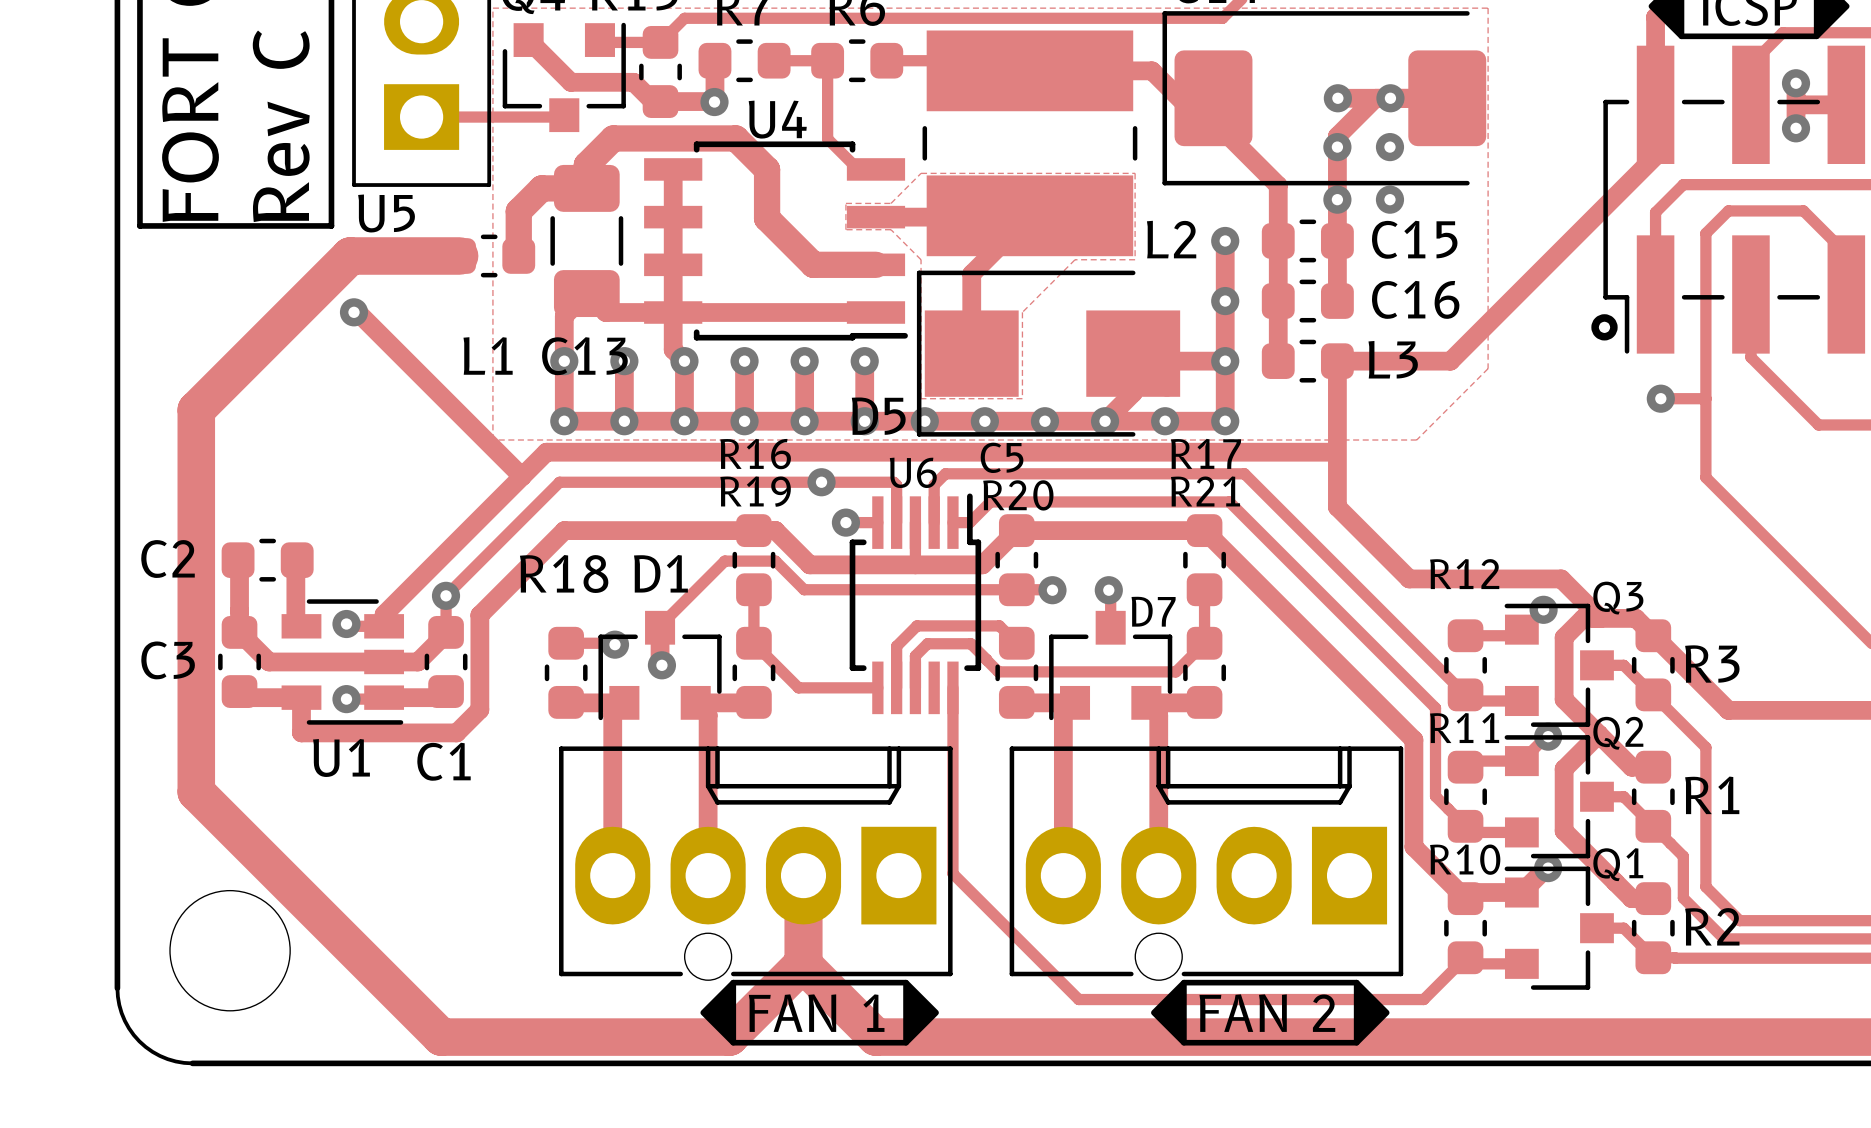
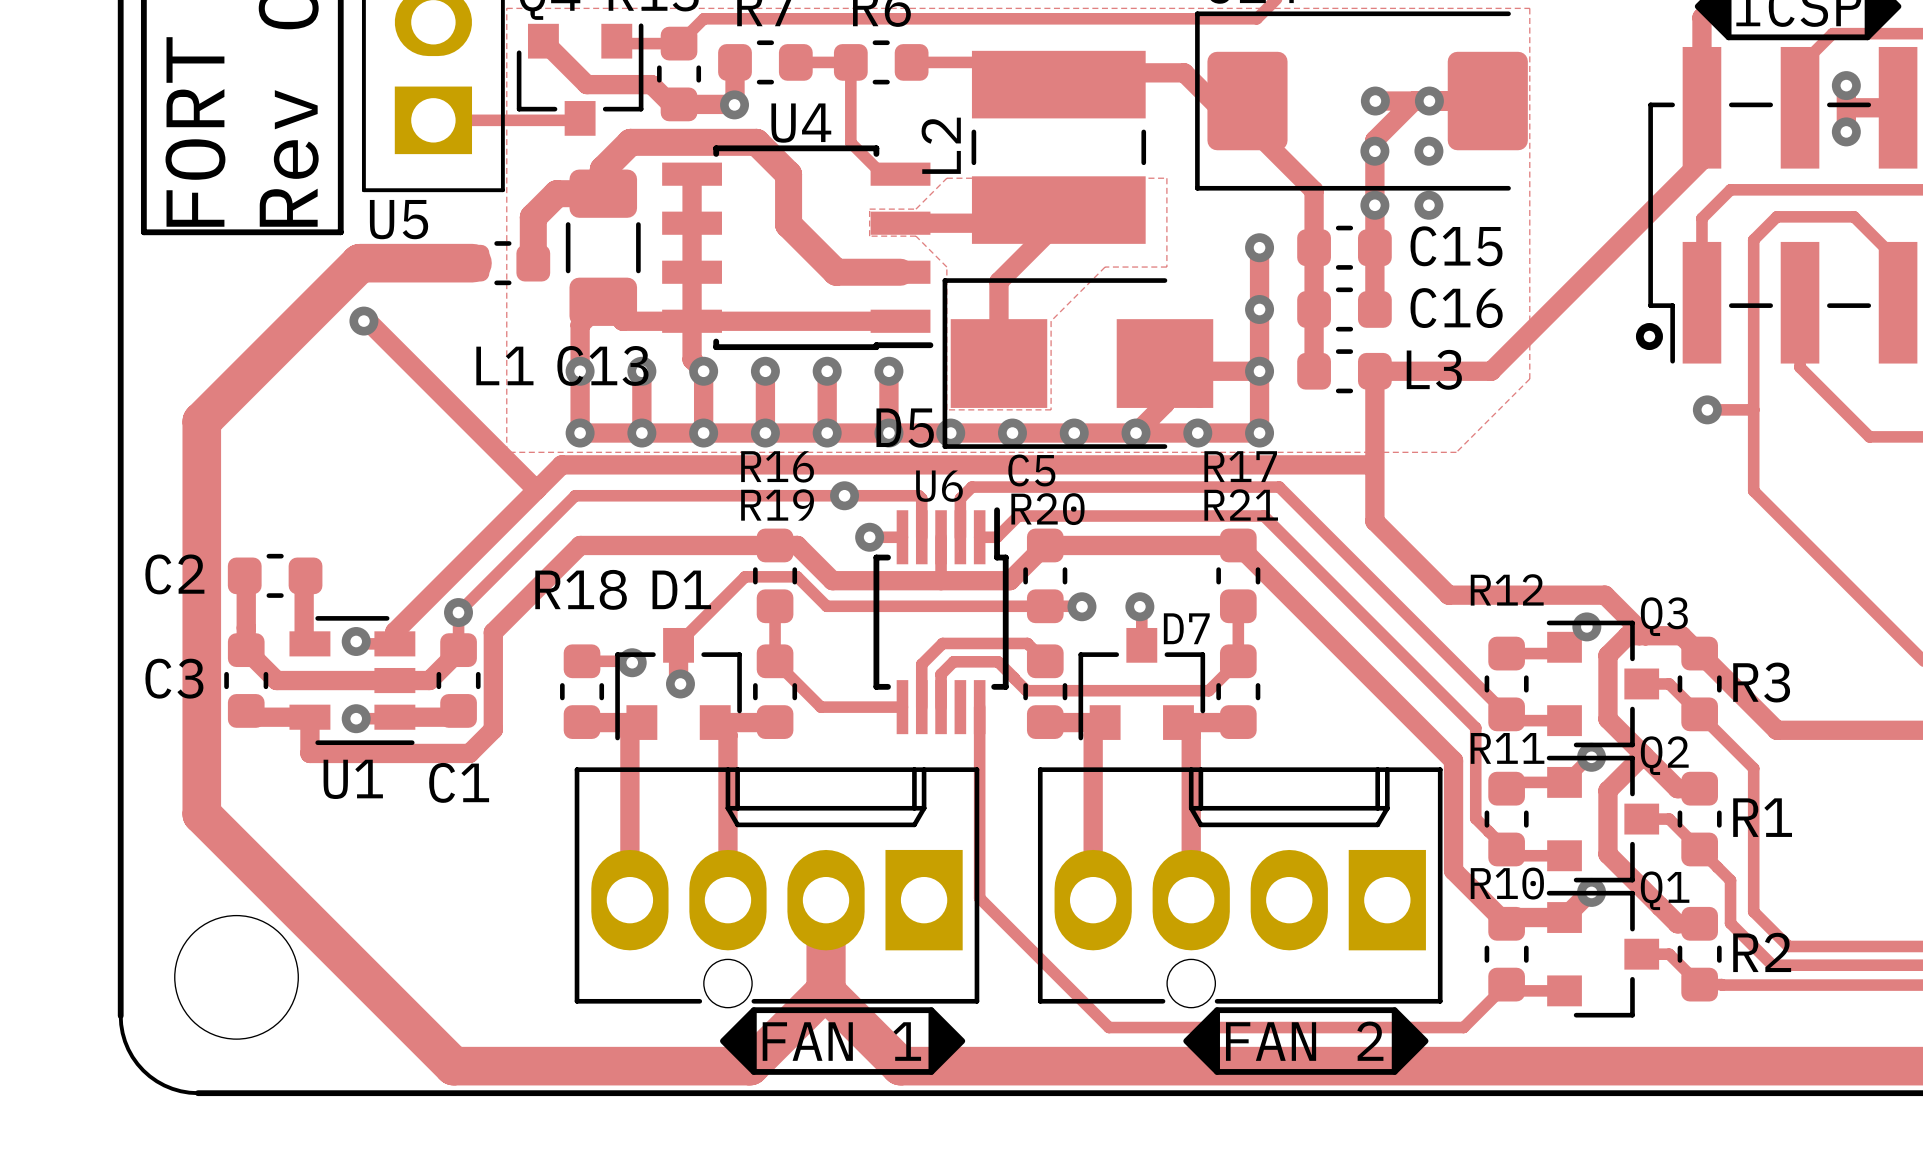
L2 footprint: [922, 30, 1138, 257] -> [971, 50, 1147, 244]
L2 name rotation: 0° (1171, 239) -> 90° counterclockwise (941, 145)
L2 name position: L2 (1171, 239) -> L2 (941, 145)

